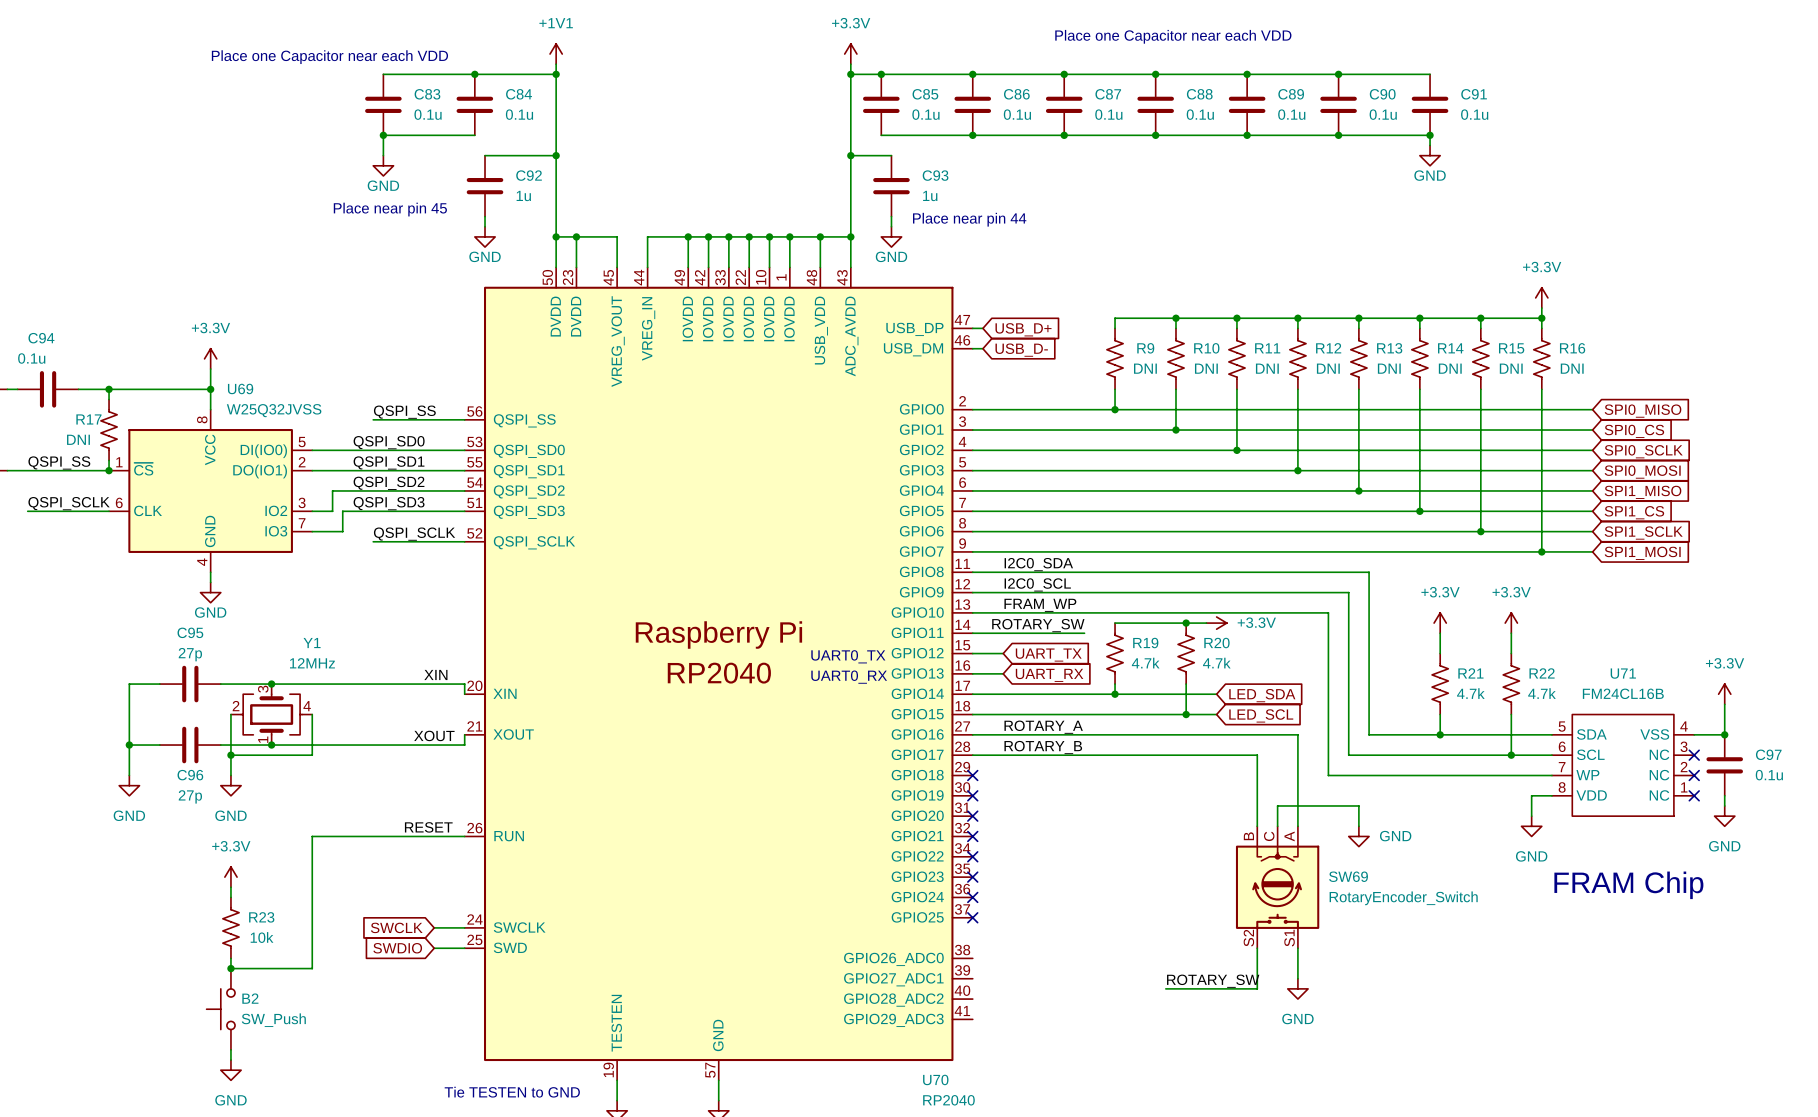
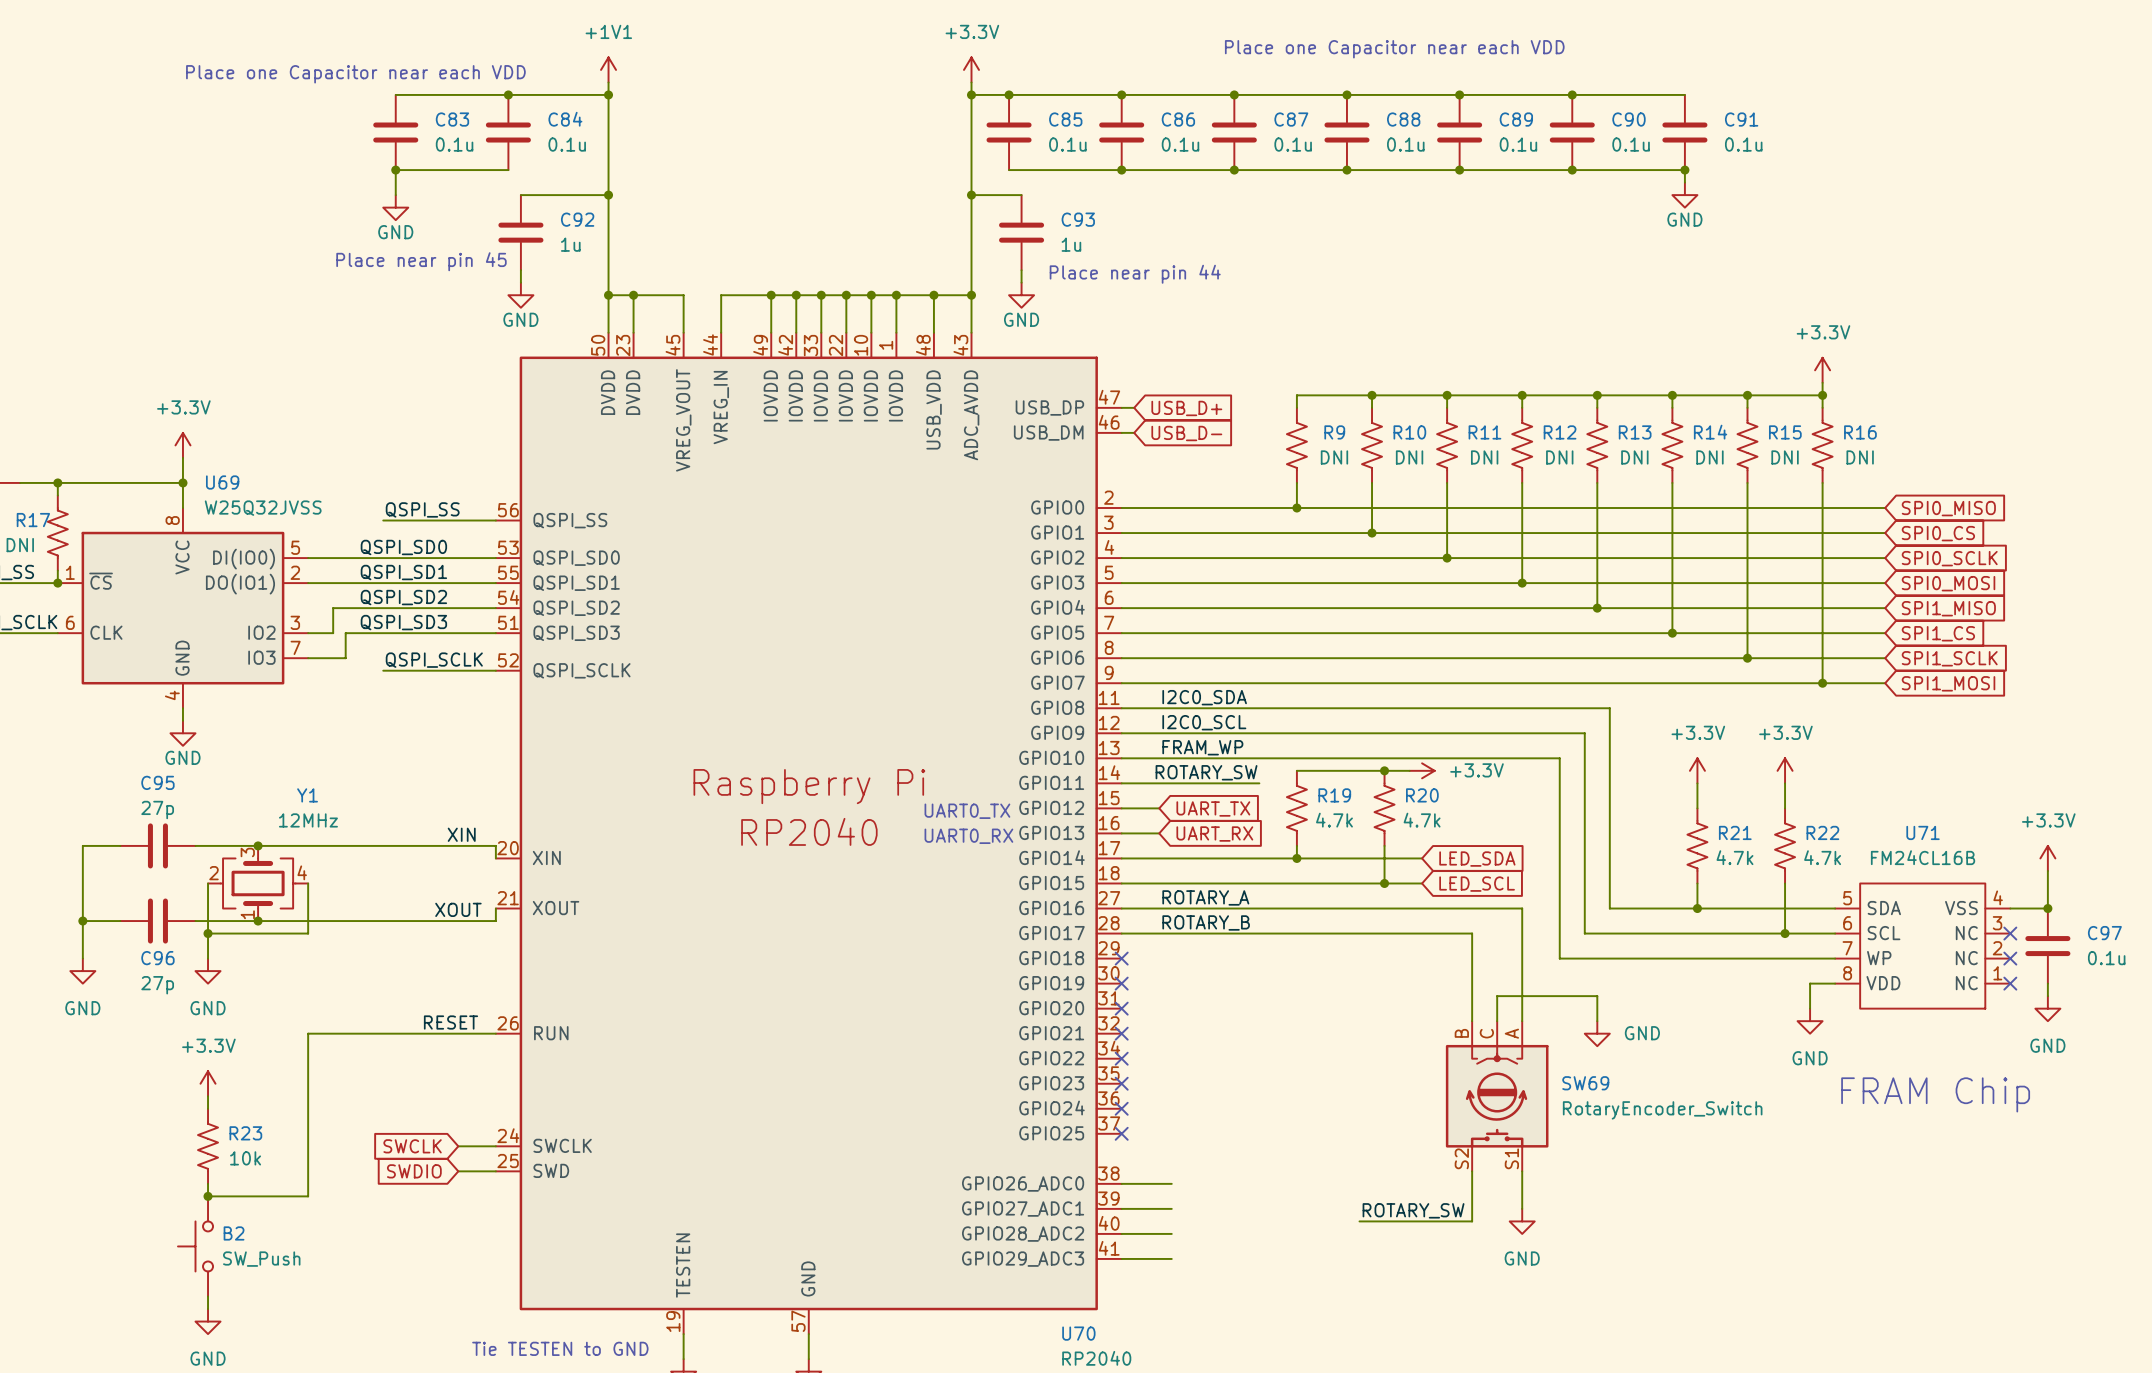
wire: none -> (1121, 1183) (1171, 1183)
wire: none -> (1121, 1208) (1171, 1208)
wire: none -> (1121, 1233) (1171, 1233)
wire: none -> (1121, 1258) (1171, 1258)

